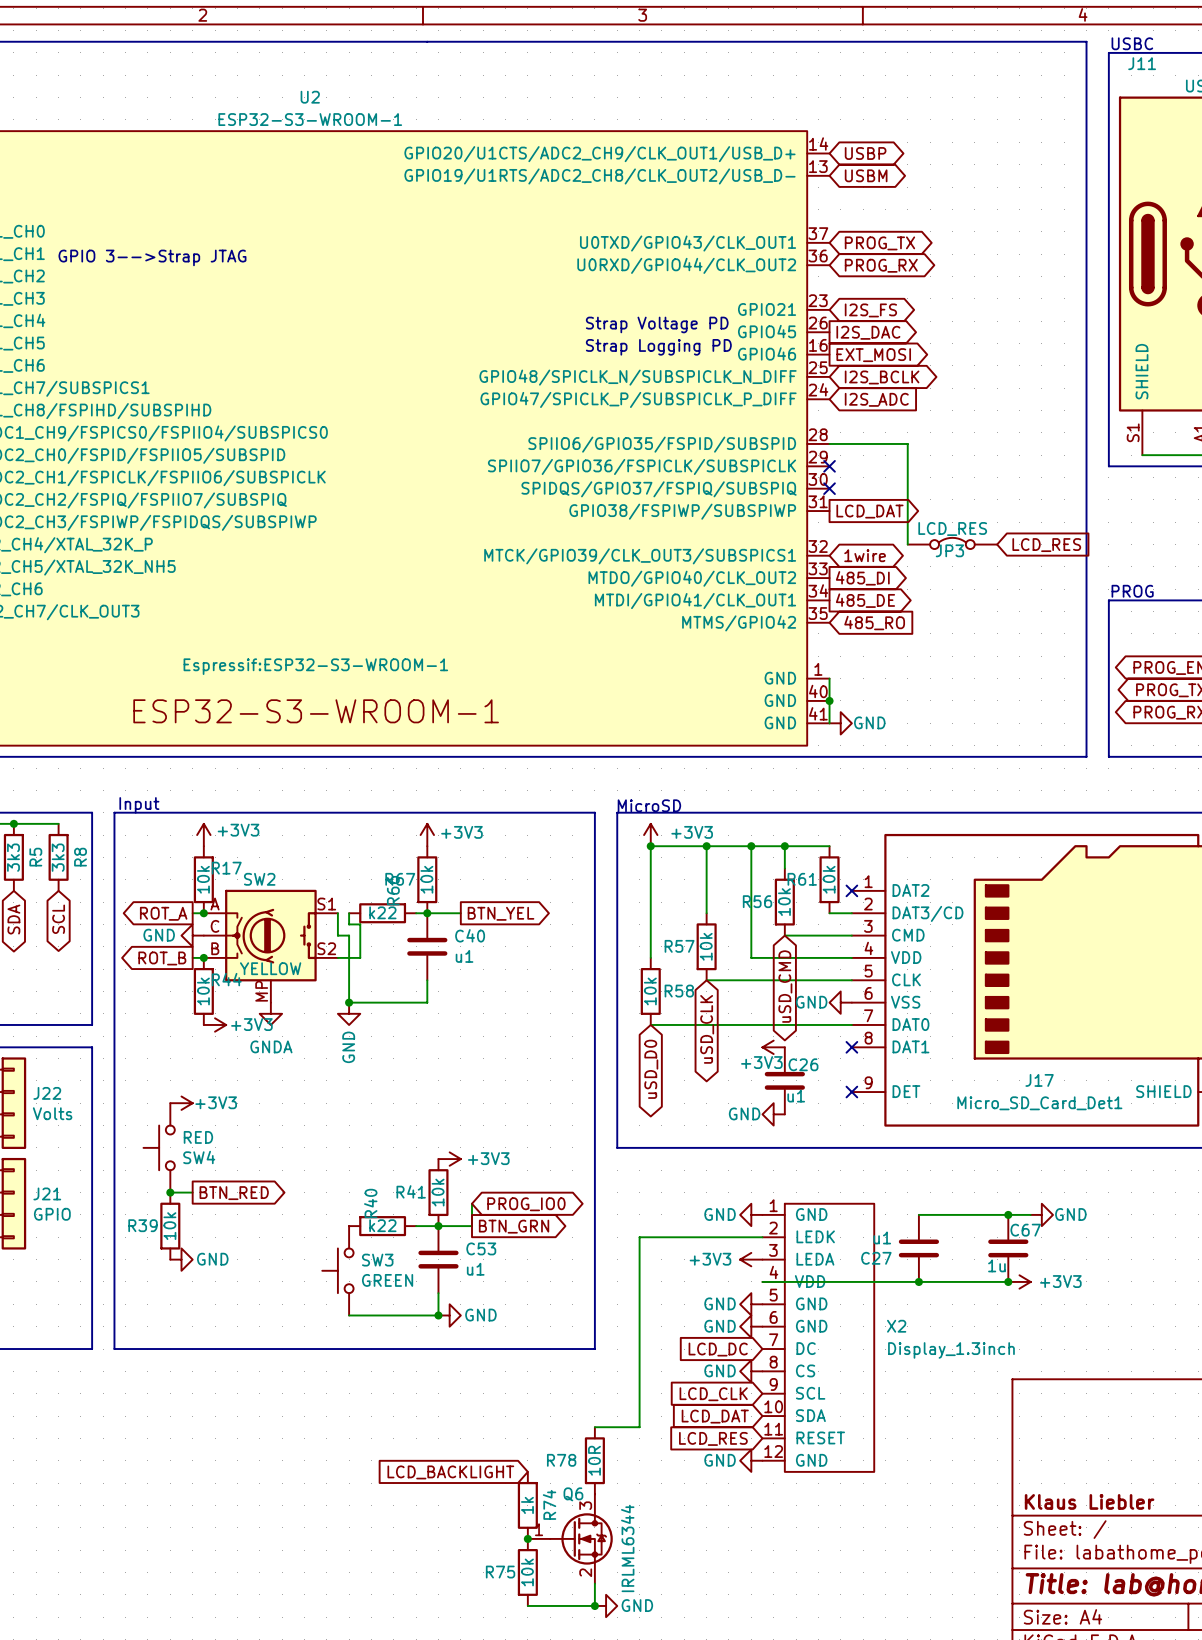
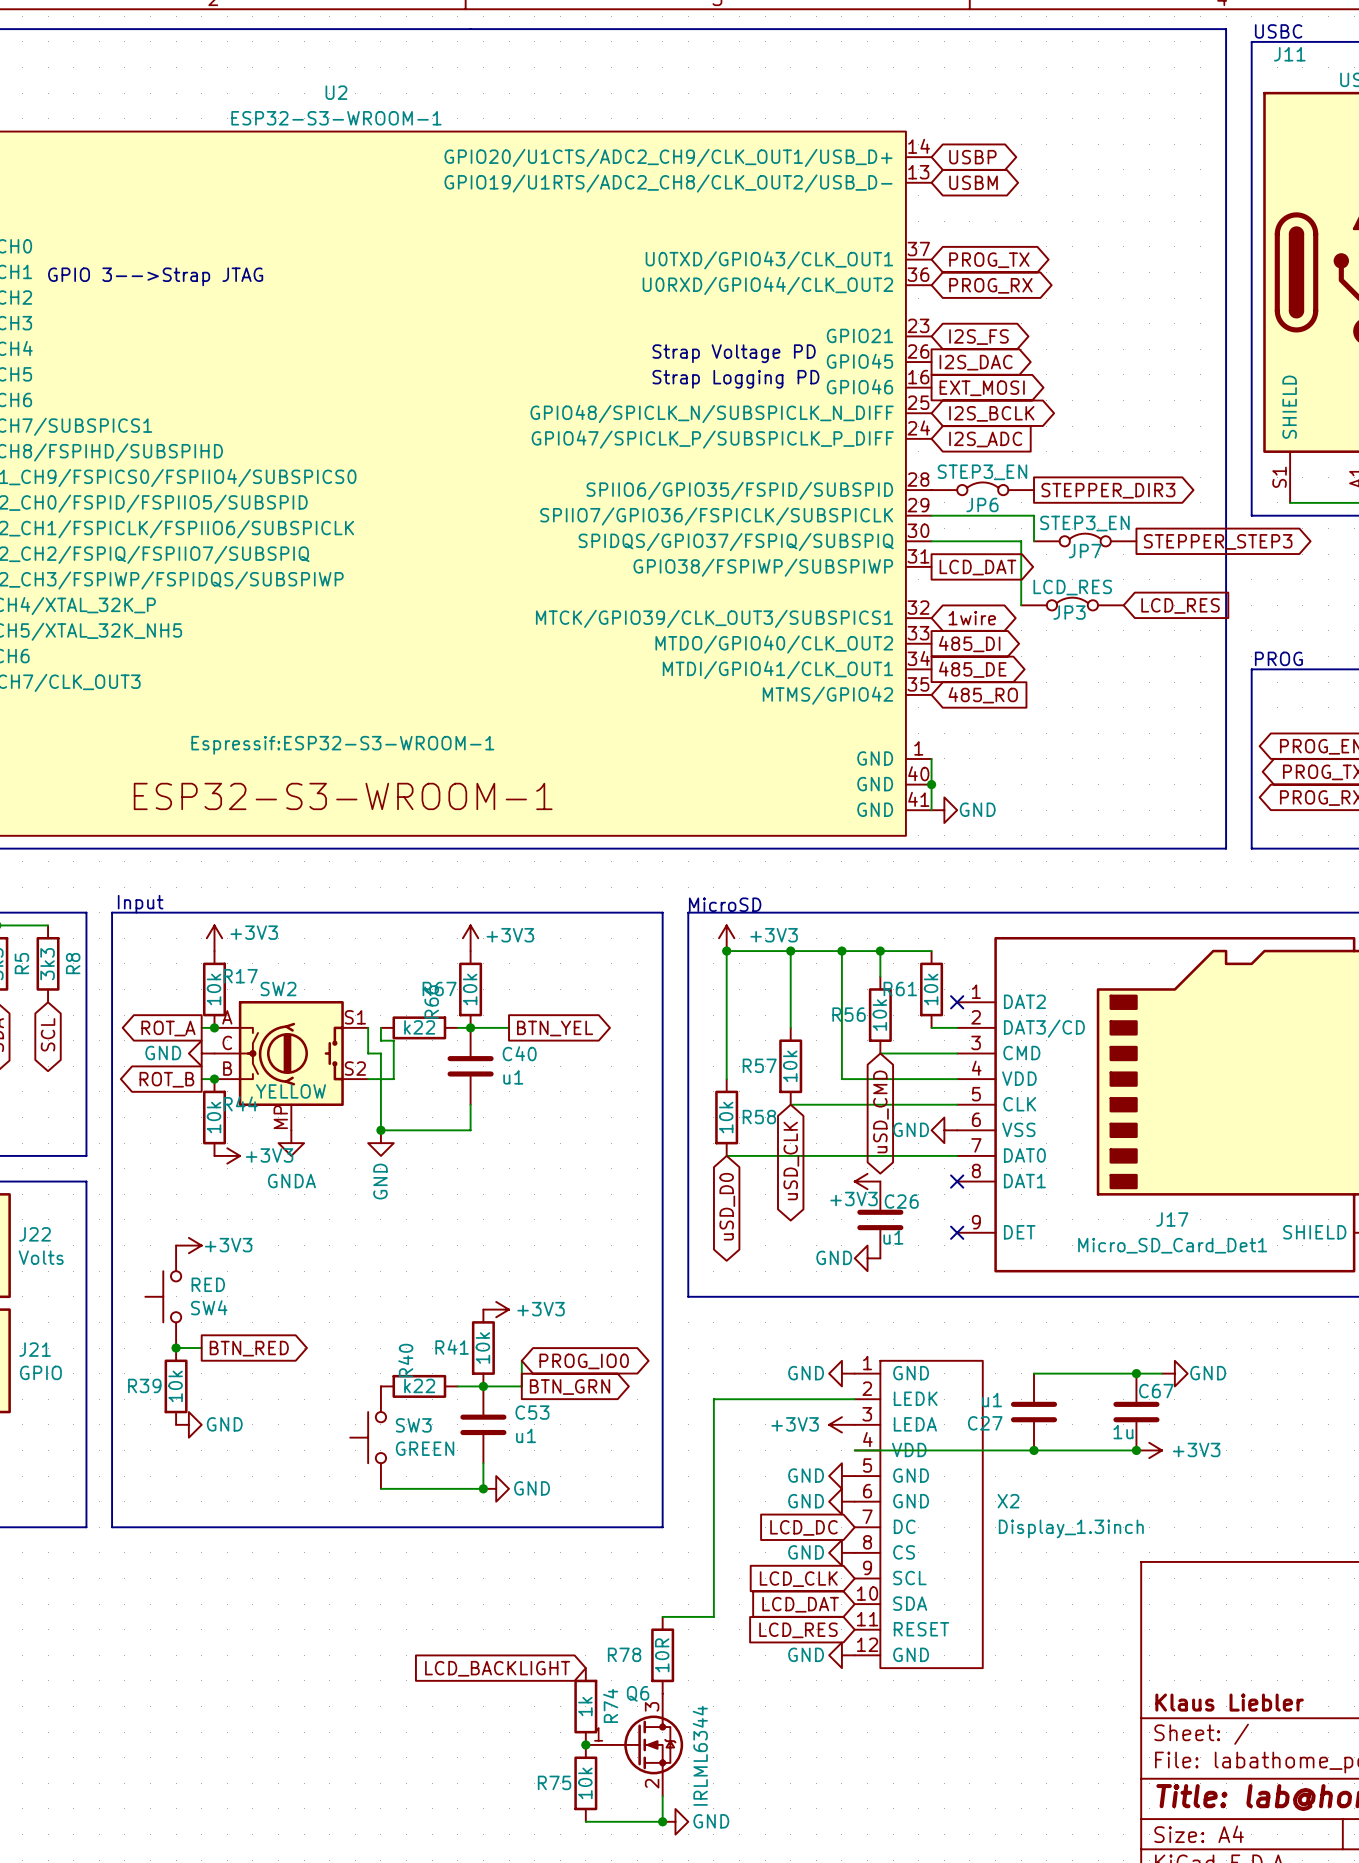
JP6: none -> STEP3_EN (982, 488)
wire: (829, 443) (907, 443) (907, 488) -> (931, 541) (1021, 541)
global label: none -> STEPPER_DIR3 (1108, 490)
wire: none -> (931, 515) (1034, 515) (1034, 541)
no-connect mark: (829, 466) -> none
JP7: none -> STEP3_EN (1085, 540)
no-connect mark: (829, 488) -> none
global label: none -> STEPPER_STEP3 (1218, 541)

